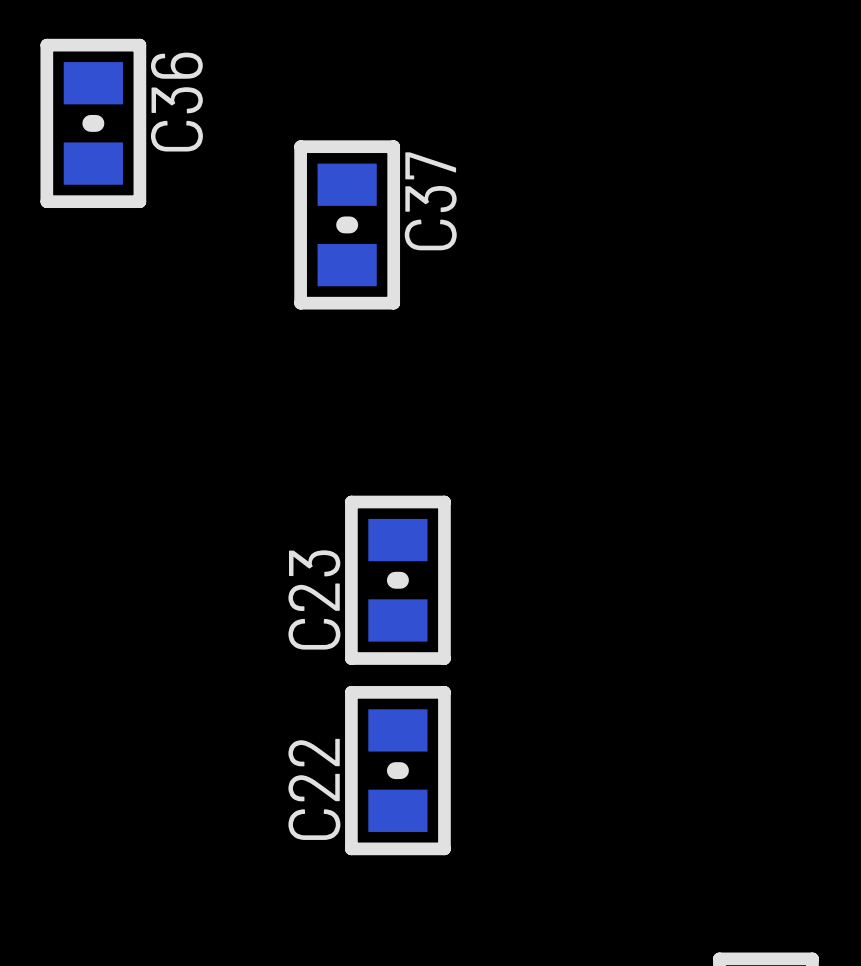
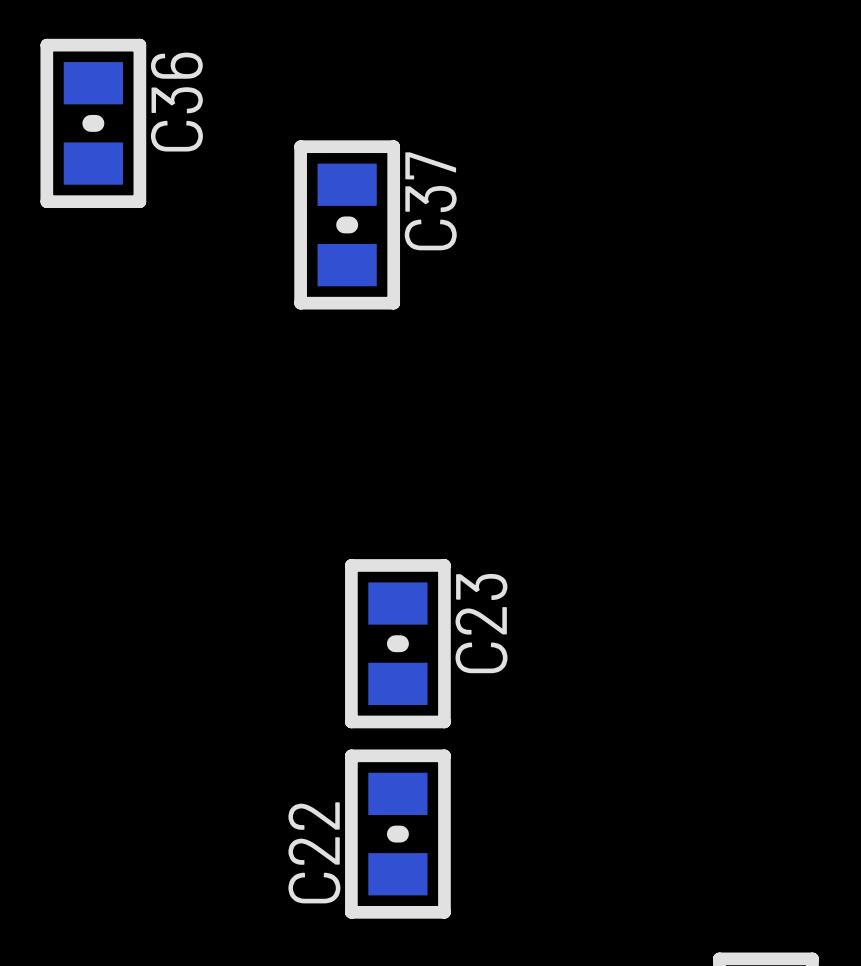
C23 position: (397, 580) -> (397, 643)
C23 name position: C23 (314, 599) -> C23 (481, 623)
C22 position: (397, 770) -> (397, 834)

